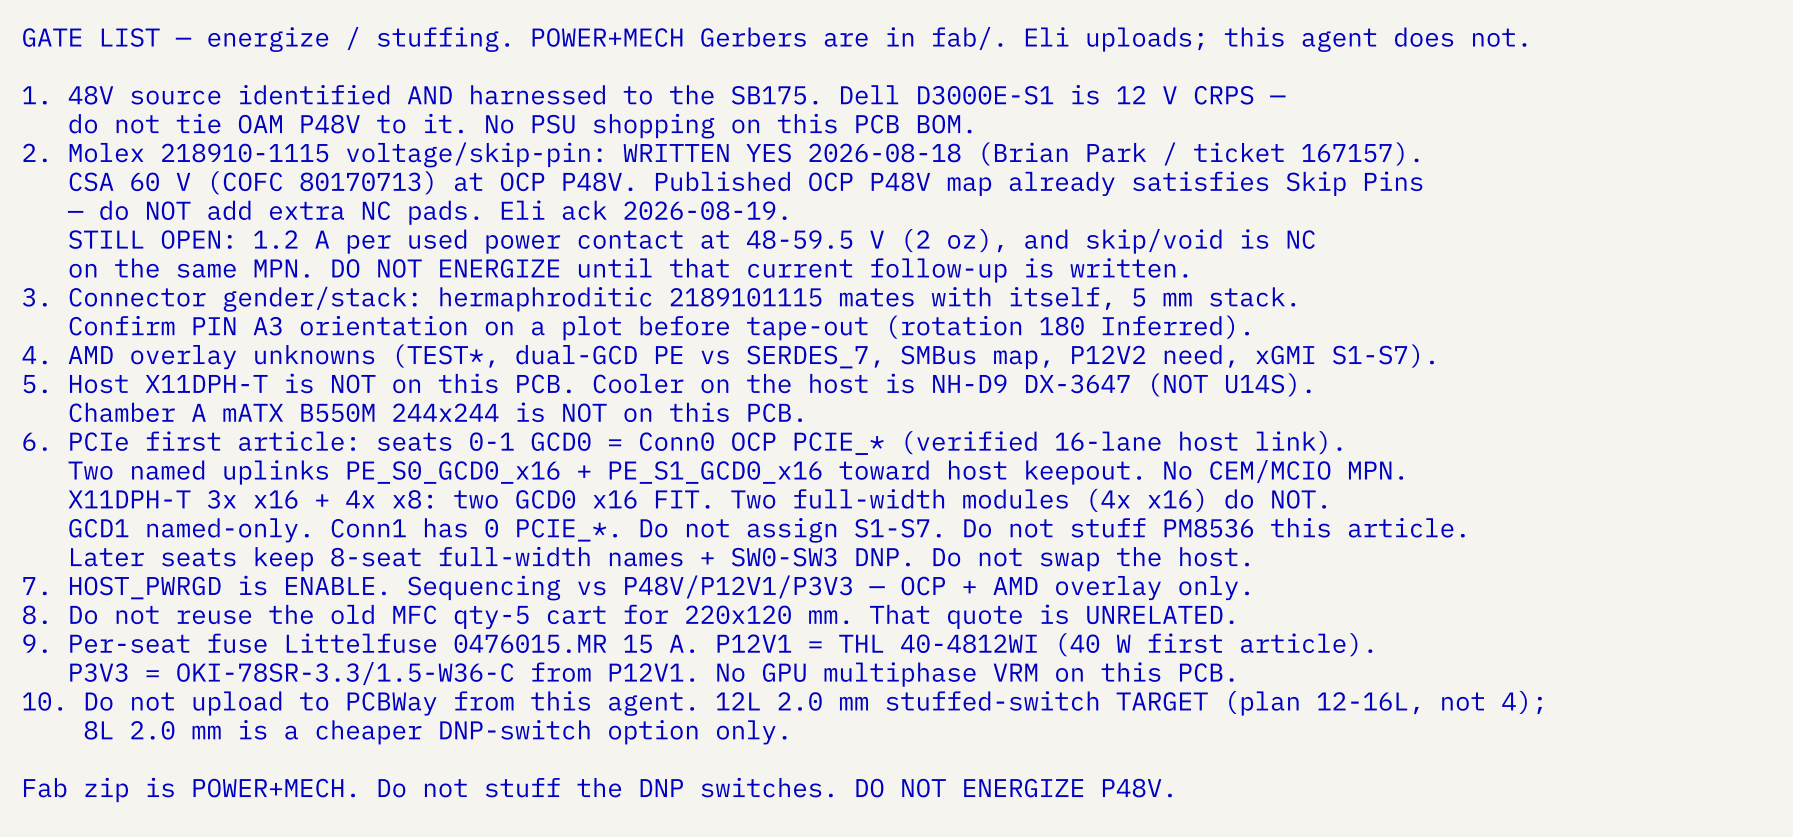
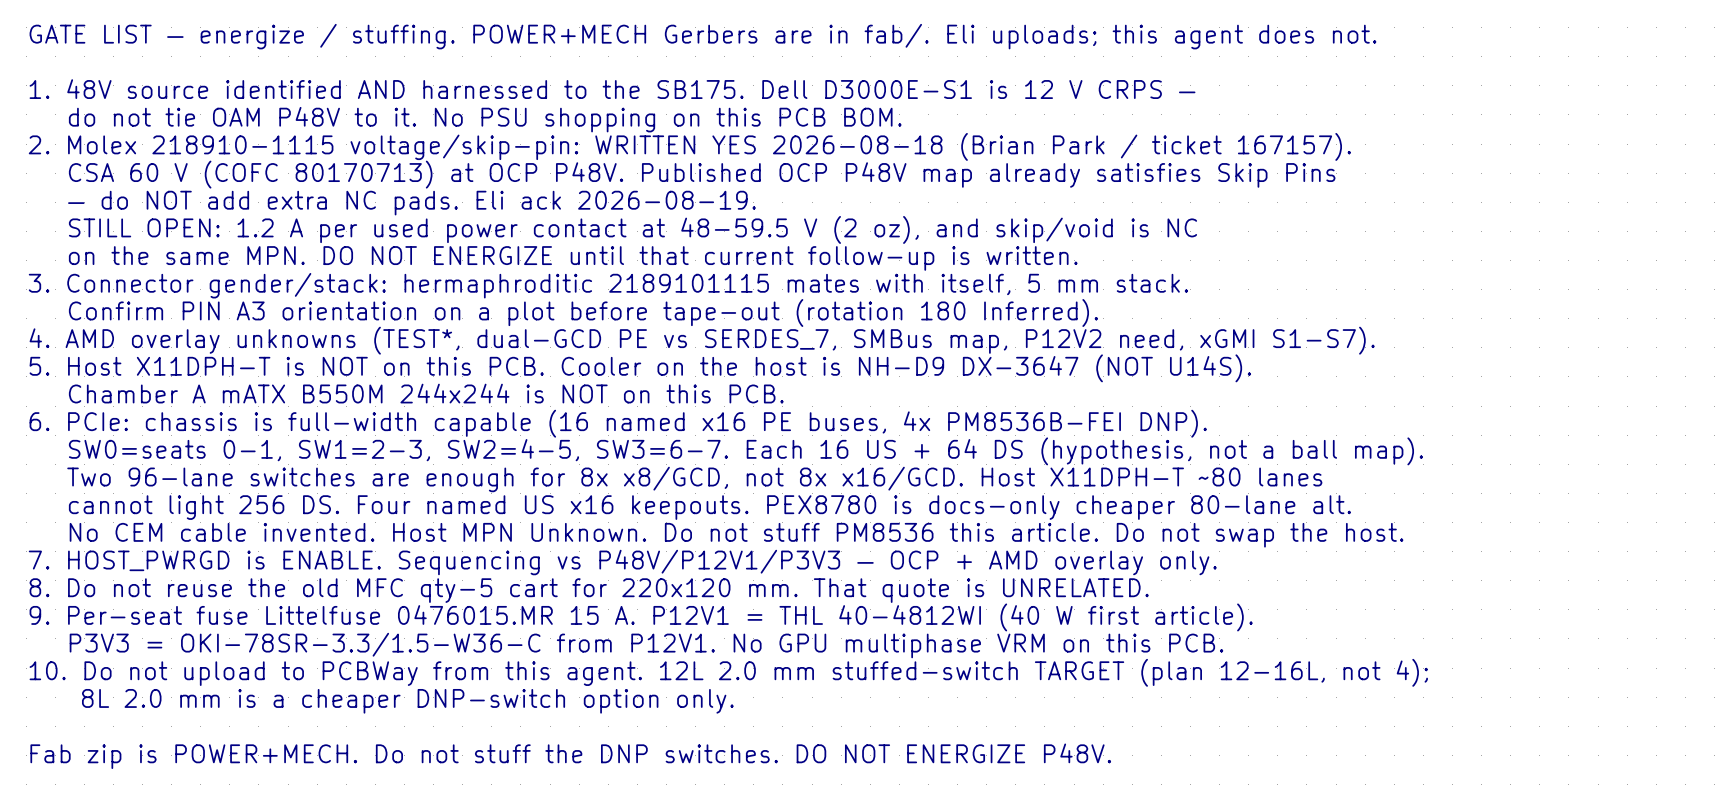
text: 6. PCIe first article: seats 0-1 GCD0 = Conn0 OCP PCIE_* (verified 16-lane host link). (682, 443) -> 6. PCIe: chassis is full-width capable (16 named x16 PE buses, 4x PM8536B-FEI DNP). (618, 423)
text: Two named uplinks PE_S0_GCD0_x16 + PE_S1_GCD0_x16 toward host keepout. No CEM/MCIO MPN. (735, 472) -> SW0=seats 0-1, SW1=2-3, SW2=4-5, SW3=6-7. Each 16 US + 64 DS (hypothesis, not a ball map). (745, 451)
text: X11DPH-T 3x x16 + 4x x8: two GCD0 x16 FIT. Two full-width modules (4x x16) do NOT. (697, 500) -> Two 96-lane switches are enough for 8x x8/GCD, not 8x x16/GCD. Host X11DPH-T ~80 lanes (694, 479)
text: GCD1 named-only. Conn1 has 0 PCIE_*. Do not assign S1-S7. Do not stuff PM8536 this article. (767, 530) -> cannot light 256 DS. Four named US x16 keepouts. PEX8780 is docs-only cheaper 80-lane alt. (709, 507)
text: Later seats keep 8-seat full-width names + SW0-SW3 DNP. Do not swap the host. (659, 559) -> No CEM cable invented. Host MPN Unknown. Do not stuff PM8536 this article. Do not swap the host. (736, 535)

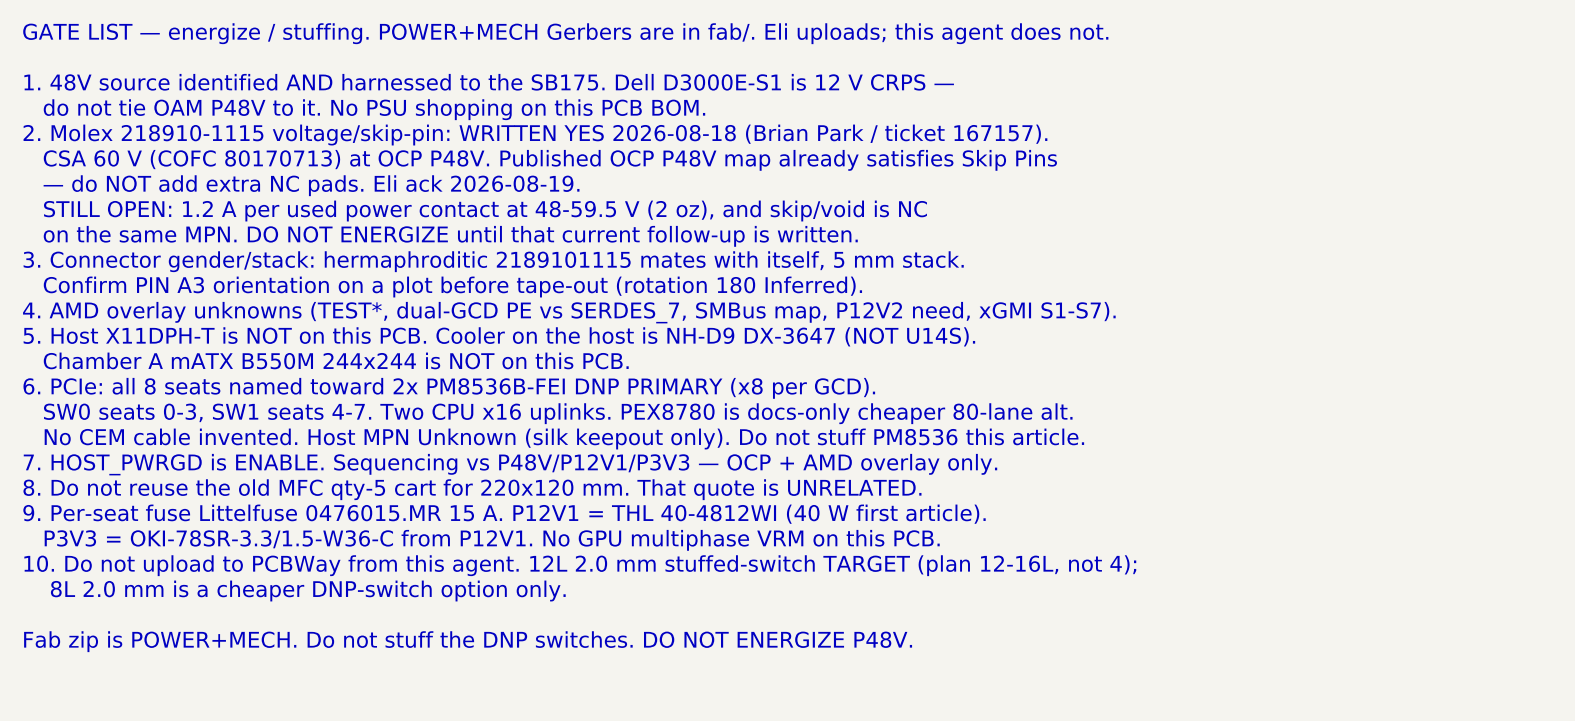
text: 6. PCIe: chassis is full-width capable (16 named x16 PE buses, 4x PM8536B-FEI DNP). (618, 423) -> 6. PCIe: all 8 seats named toward 2x PM8536B-FEI DNP PRIMARY (x8 per GCD). (449, 388)
text: SW0=seats 0-1, SW1=2-3, SW2=4-5, SW3=6-7. Each 16 US + 64 DS (hypothesis, not a ball map). (745, 451) -> SW0 seats 0-3, SW1 seats 4-7. Two CPU x16 uplinks. PEX8780 is docs-only cheaper 80-lane alt. (558, 413)
text: Two 96-lane switches are enough for 8x x8/GCD, not 8x x16/GCD. Host X11DPH-T ~80 lanes (694, 479) -> No CEM cable invented. Host MPN Unknown (silk keepout only). Do not stuff PM8536 this article. (564, 439)
text: cannot light 256 DS. Four named US x16 keepouts. PEX8780 is docs-only cheaper 80-lane alt. (709, 507) -> 7. HOST_PWRGD is ENABLE. Sequencing vs P48V/P12V1/P3V3 — OCP + AMD overlay only. (510, 464)
text: No CEM cable invented. Host MPN Unknown. Do not stuff PM8536 this article. Do not swap the host. (736, 535) -> 8. Do not reuse the old MFC qty-5 cart for 220x120 mm. That quote is UNRELATED. (472, 489)
text: 7. HOST_PWRGD is ENABLE. Sequencing vs P48V/P12V1/P3V3 — OCP + AMD overlay only. (622, 562) -> 9. Per-seat fuse Littelfuse 0476015.MR 15 A. P12V1 = THL 40-4812WI (40 W first article). (504, 514)
text: 8. Do not reuse the old MFC qty-5 cart for 220x120 mm. That quote is UNRELATED. (589, 590) -> P3V3 = OKI-78SR-3.3/1.5-W36-C from P12V1. No GPU multiphase VRM on this PCB. (492, 540)
text: 9. Per-seat fuse Littelfuse 0476015.MR 15 A. P12V1 = THL 40-4812WI (40 W first article). (641, 617) -> 10. Do not upload to PCBWay from this agent. 12L 2.0 mm stuffed-switch TARGET (plan 12-16L, not 4); (580, 565)
text: P3V3 = OKI-78SR-3.3/1.5-W36-C from P12V1. No GPU multiphase VRM on this PCB. (646, 645) -> 8L 2.0 mm is a cheaper DNP-switch option only. (308, 591)
text: 10. Do not upload to PCBWay from this agent. 12L 2.0 mm stuffed-switch TARGET (plan 12-16L, not 4); (728, 672) -> none
text: 8L 2.0 mm is a cheaper DNP-switch option only. (407, 701) -> Fab zip is POWER+MECH. Do not stuff the DNP switches. DO NOT ENERGIZE P48V. (468, 641)
text: Fab zip is POWER+MECH. Do not stuff the DNP switches. DO NOT ENERGIZE P48V. (570, 756) -> none

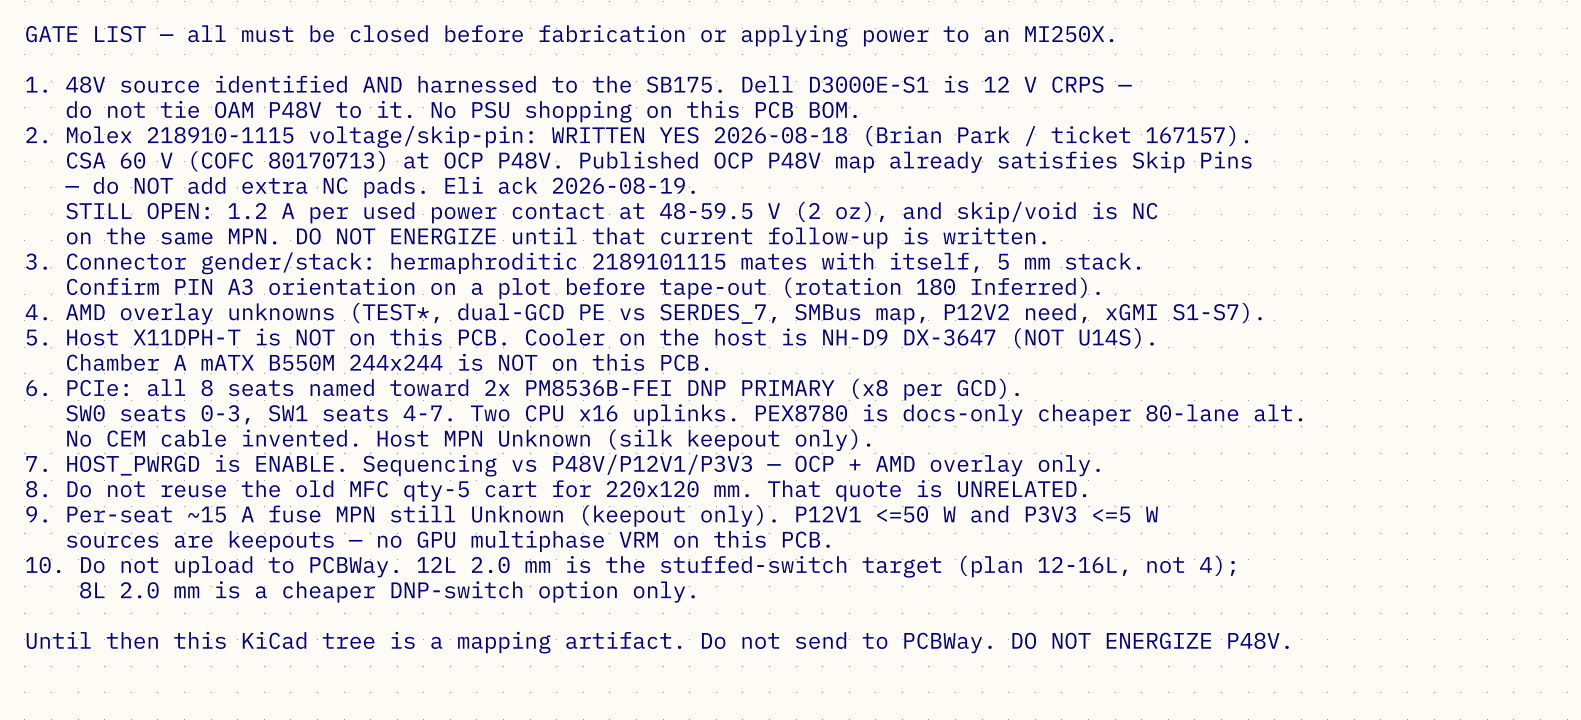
text: GATE LIST — energize / stuffing. POWER+MECH Gerbers are in fab/. Eli uploads; this agent does not. (565, 33) -> GATE LIST — all must be closed before fabrication or applying power to an MI250X. (569, 35)
text: No CEM cable invented. Host MPN Unknown (silk keepout only). Do not stuff PM8536 this article. (564, 439) -> No CEM cable invented. Host MPN Unknown (silk keepout only). (468, 440)
text: 9. Per-seat fuse Littelfuse 0476015.MR 15 A. P12V1 = THL 40-4812WI (40 W first article). (504, 514) -> 9. Per-seat ~15 A fuse MPN still Unknown (keepout only). P12V1 <=50 W and P3V3 <=5 W (592, 516)
text: P3V3 = OKI-78SR-3.3/1.5-W36-C from P12V1. No GPU multiphase VRM on this PCB. (492, 540) -> sources are keepouts — no GPU multiphase VRM on this PCB. (448, 541)
text: 10. Do not upload to PCBWay from this agent. 12L 2.0 mm stuffed-switch TARGET (plan 12-16L, not 4); (580, 565) -> 10. Do not upload to PCBWay. 12L 2.0 mm is the stuffed-switch target (plan 12-16L, not 4); (630, 566)
text: Fab zip is POWER+MECH. Do not stuff the DNP switches. DO NOT ENERGIZE P48V. (468, 641) -> Until then this KiCad tree is a mapping artifact. Do not send to PCBWay. DO NOT ENERGIZE P48V. (657, 642)

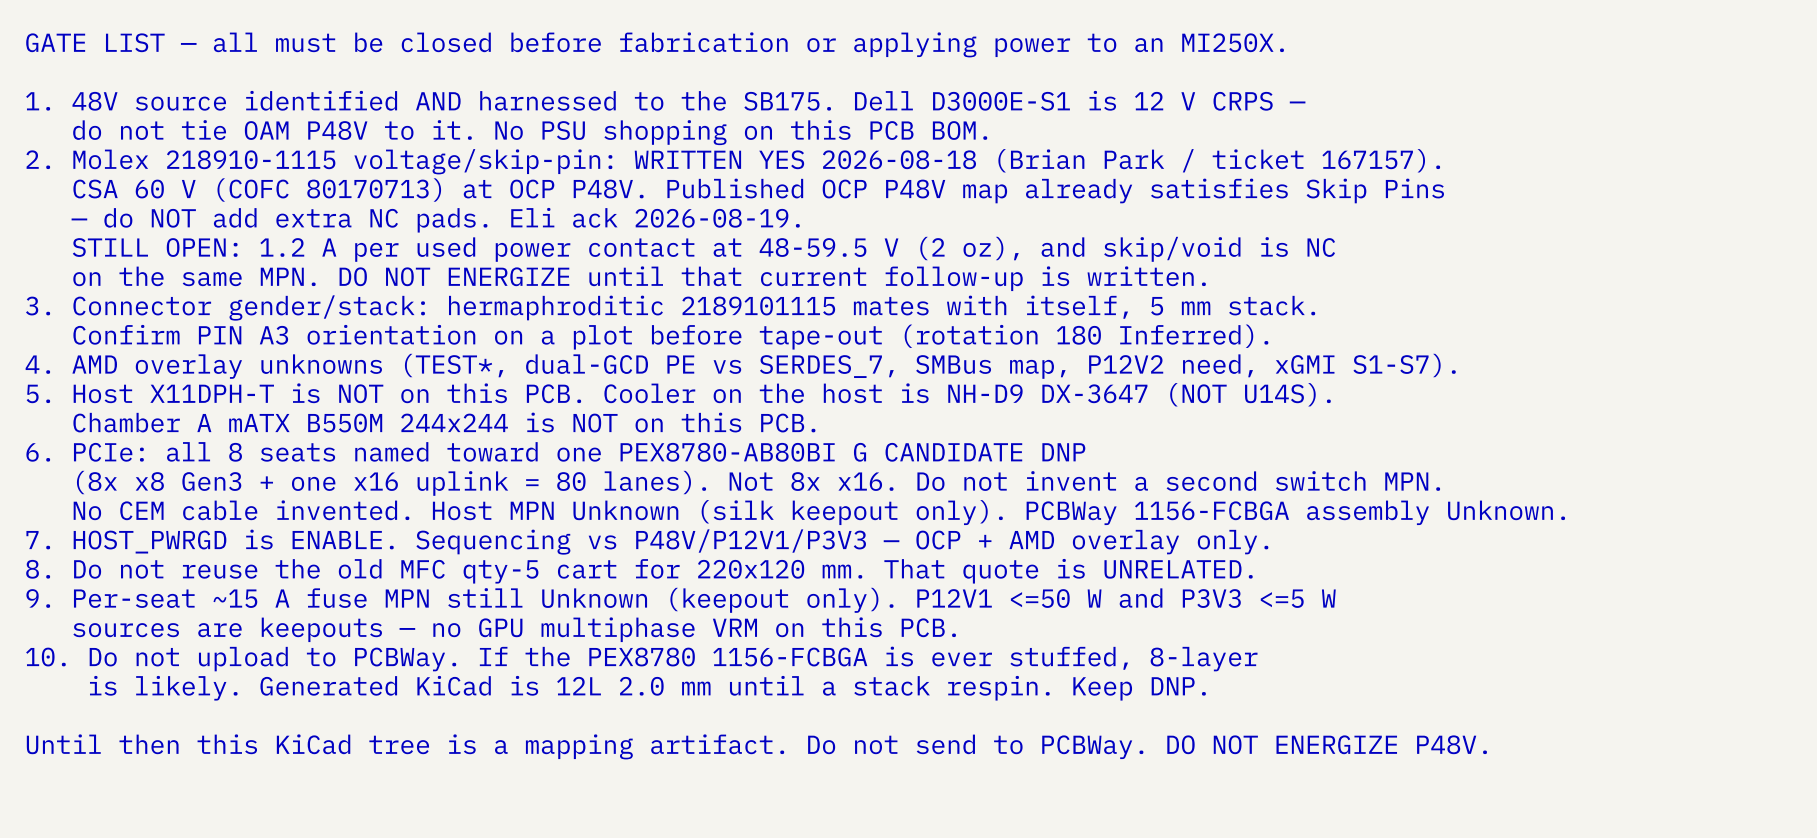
text: 6. PCIe: all 8 seats named toward 2x PM8536B-FEI DNP PRIMARY (x8 per GCD). (522, 389) -> 6. PCIe: all 8 seats named toward one PEX8780-AB80BI G CANDIDATE DNP (555, 451)
text: SW0 seats 0-3, SW1 seats 4-7. Two CPU x16 uplinks. PEX8780 is docs-only cheaper 80-lane alt. (684, 415) -> (8x x8 Gen3 + one x16 uplink = 80 lanes). Not 8x x16. Do not invent a second switch MPN. (758, 483)
text: No CEM cable invented. Host MPN Unknown (silk keepout only). (468, 440) -> No CEM cable invented. Host MPN Unknown (silk keepout only). PCBWay 1156-FCBGA assembly Unknown. (819, 512)
text: 10. Do not upload to PCBWay. 12L 2.0 mm is the stuffed-switch target (plan 12-16L, not 4); (630, 566) -> 10. Do not upload to PCBWay. If the PEX8780 1156-FCBGA is ever stuffed, 8-layer (641, 658)
text: 8L 2.0 mm is a cheaper DNP-switch option only. (387, 591) -> is likely. Generated KiCad is 12L 2.0 mm until a stack respin. Keep DNP. (647, 688)

